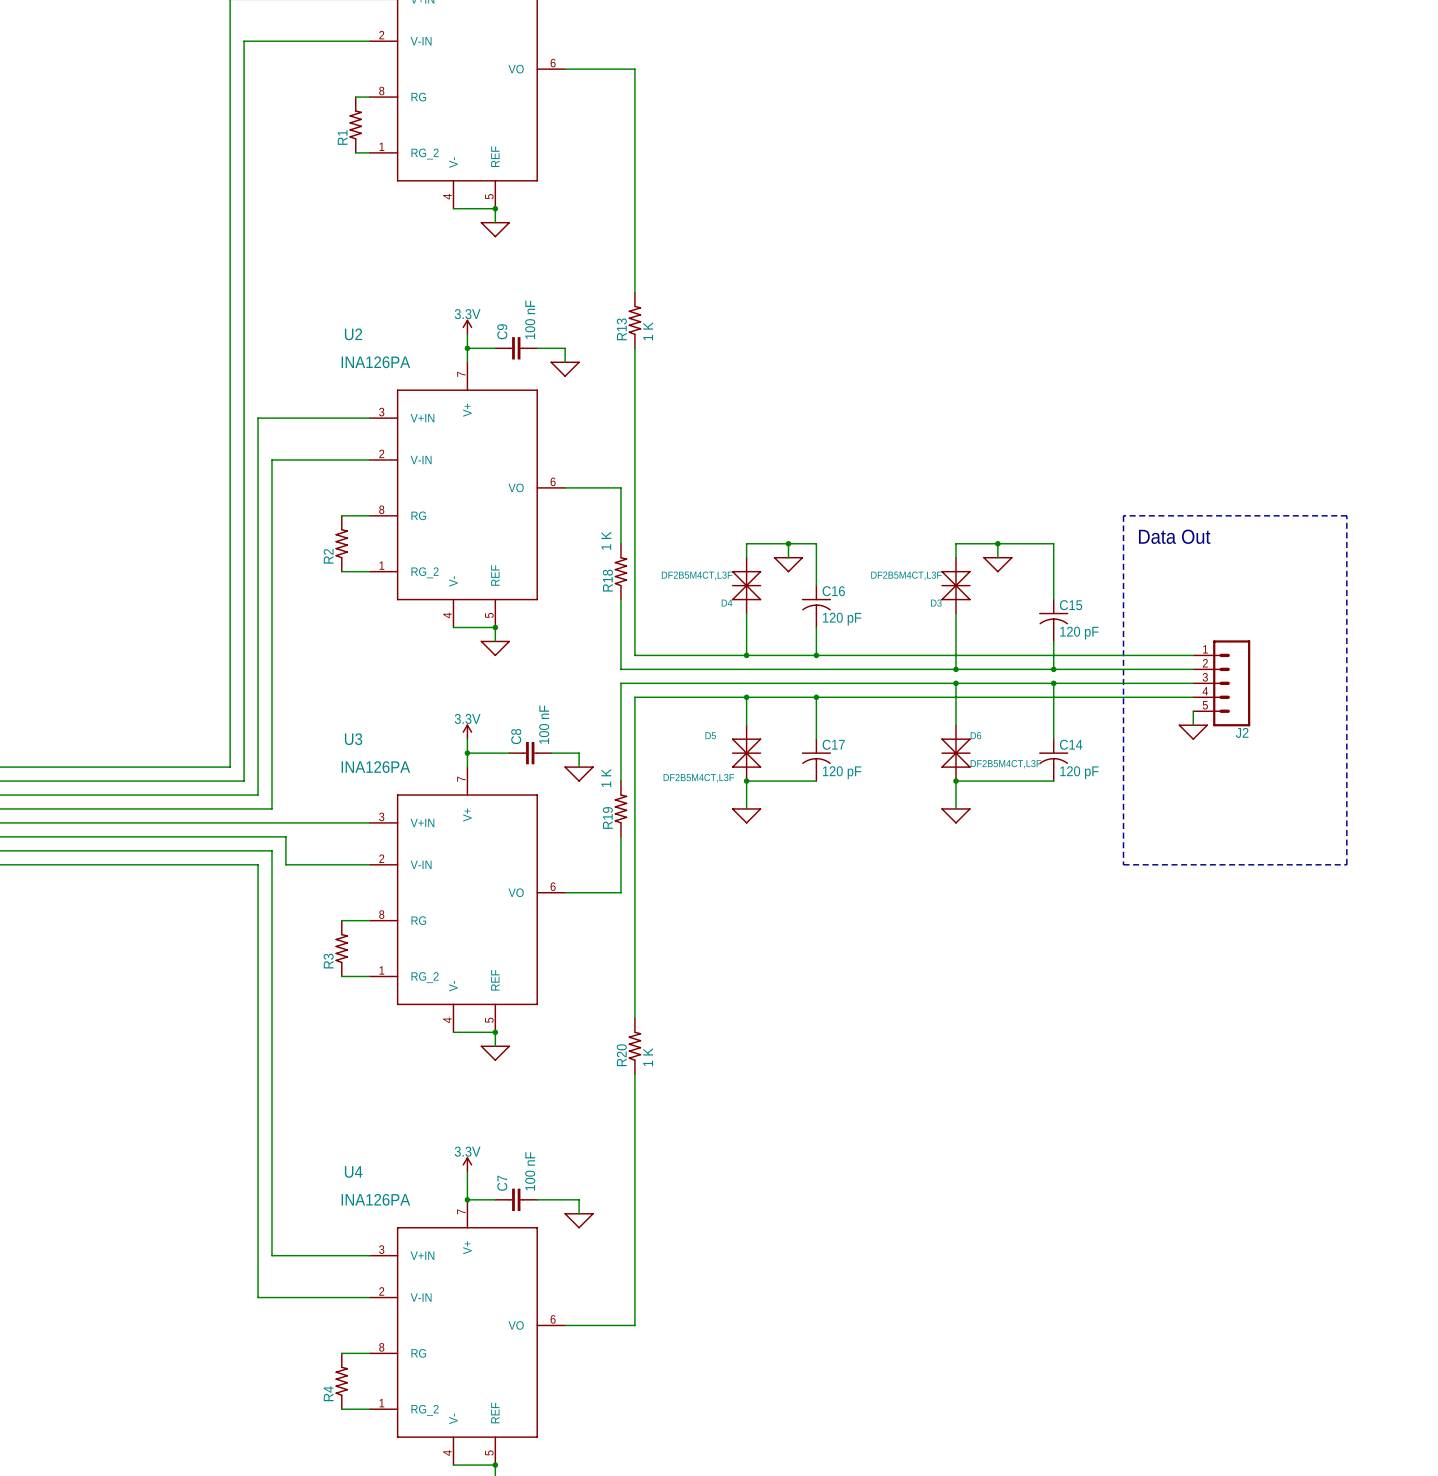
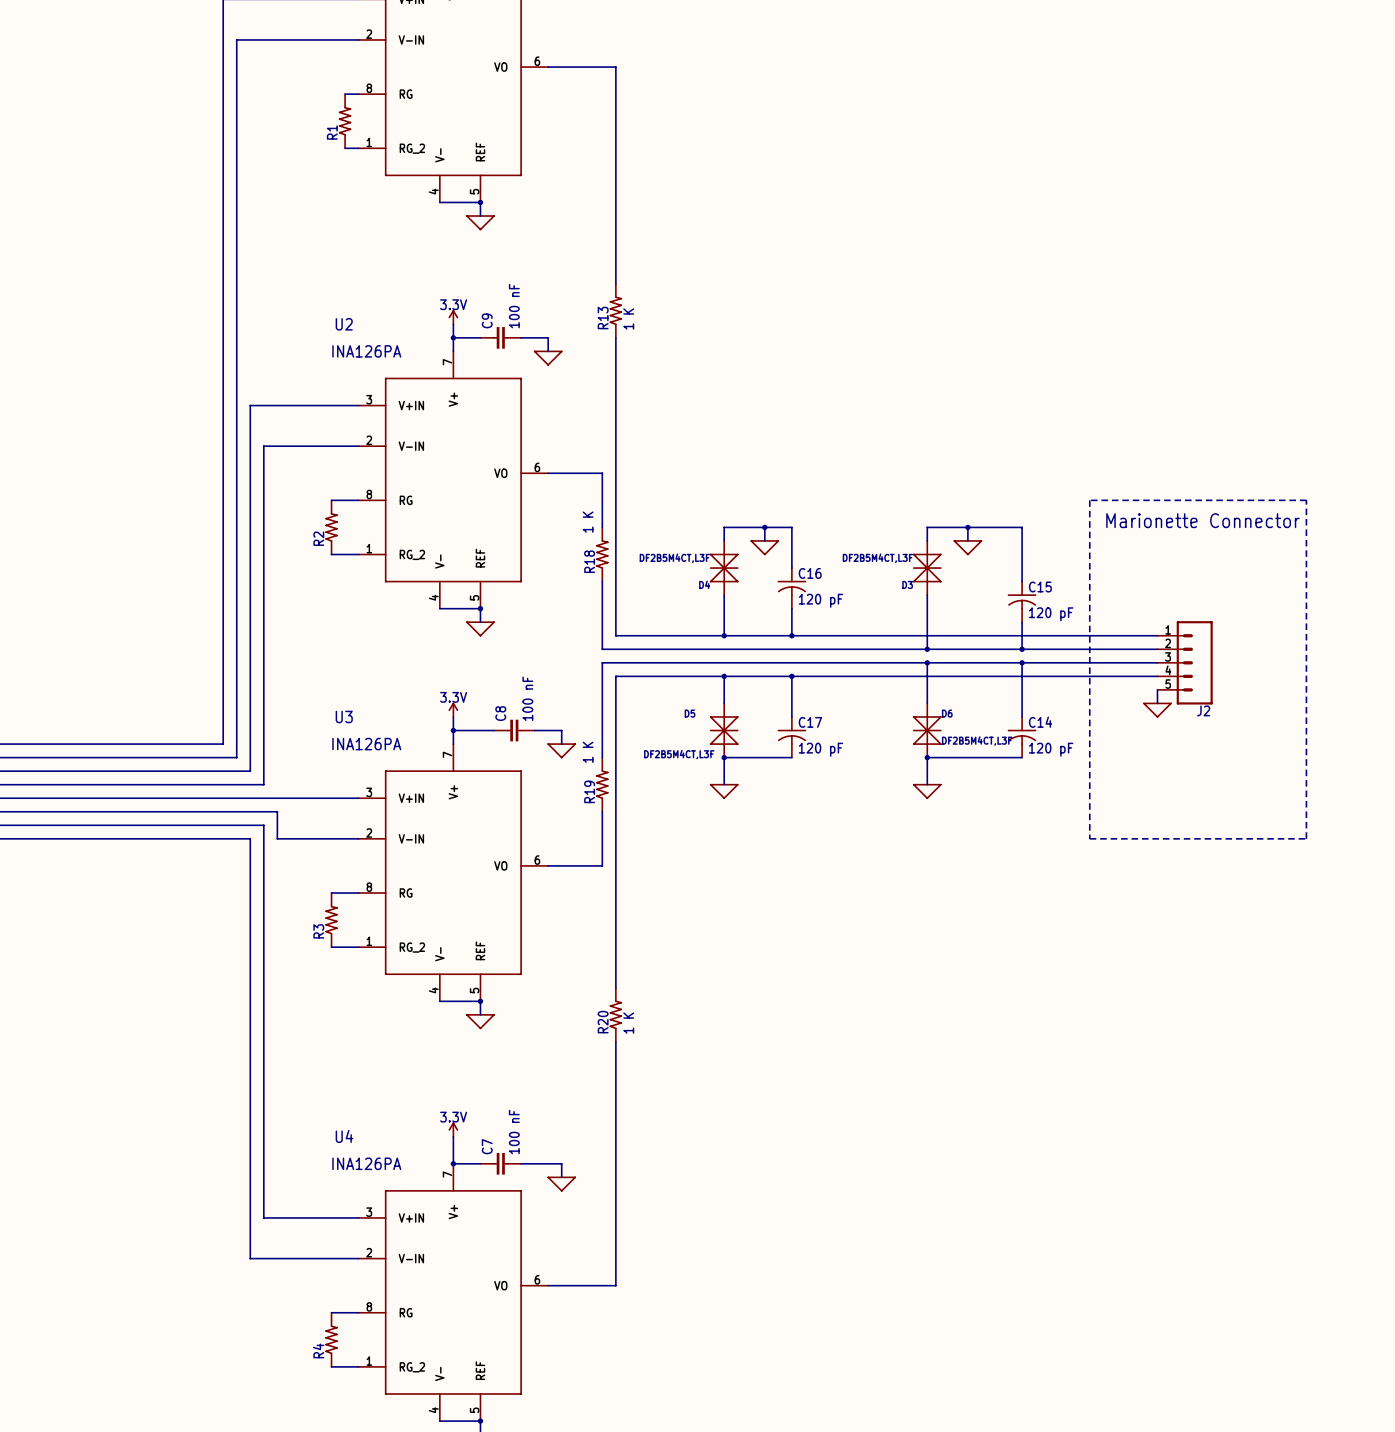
text: Data Out (1174, 536) -> Marionette Connector (1202, 520)

